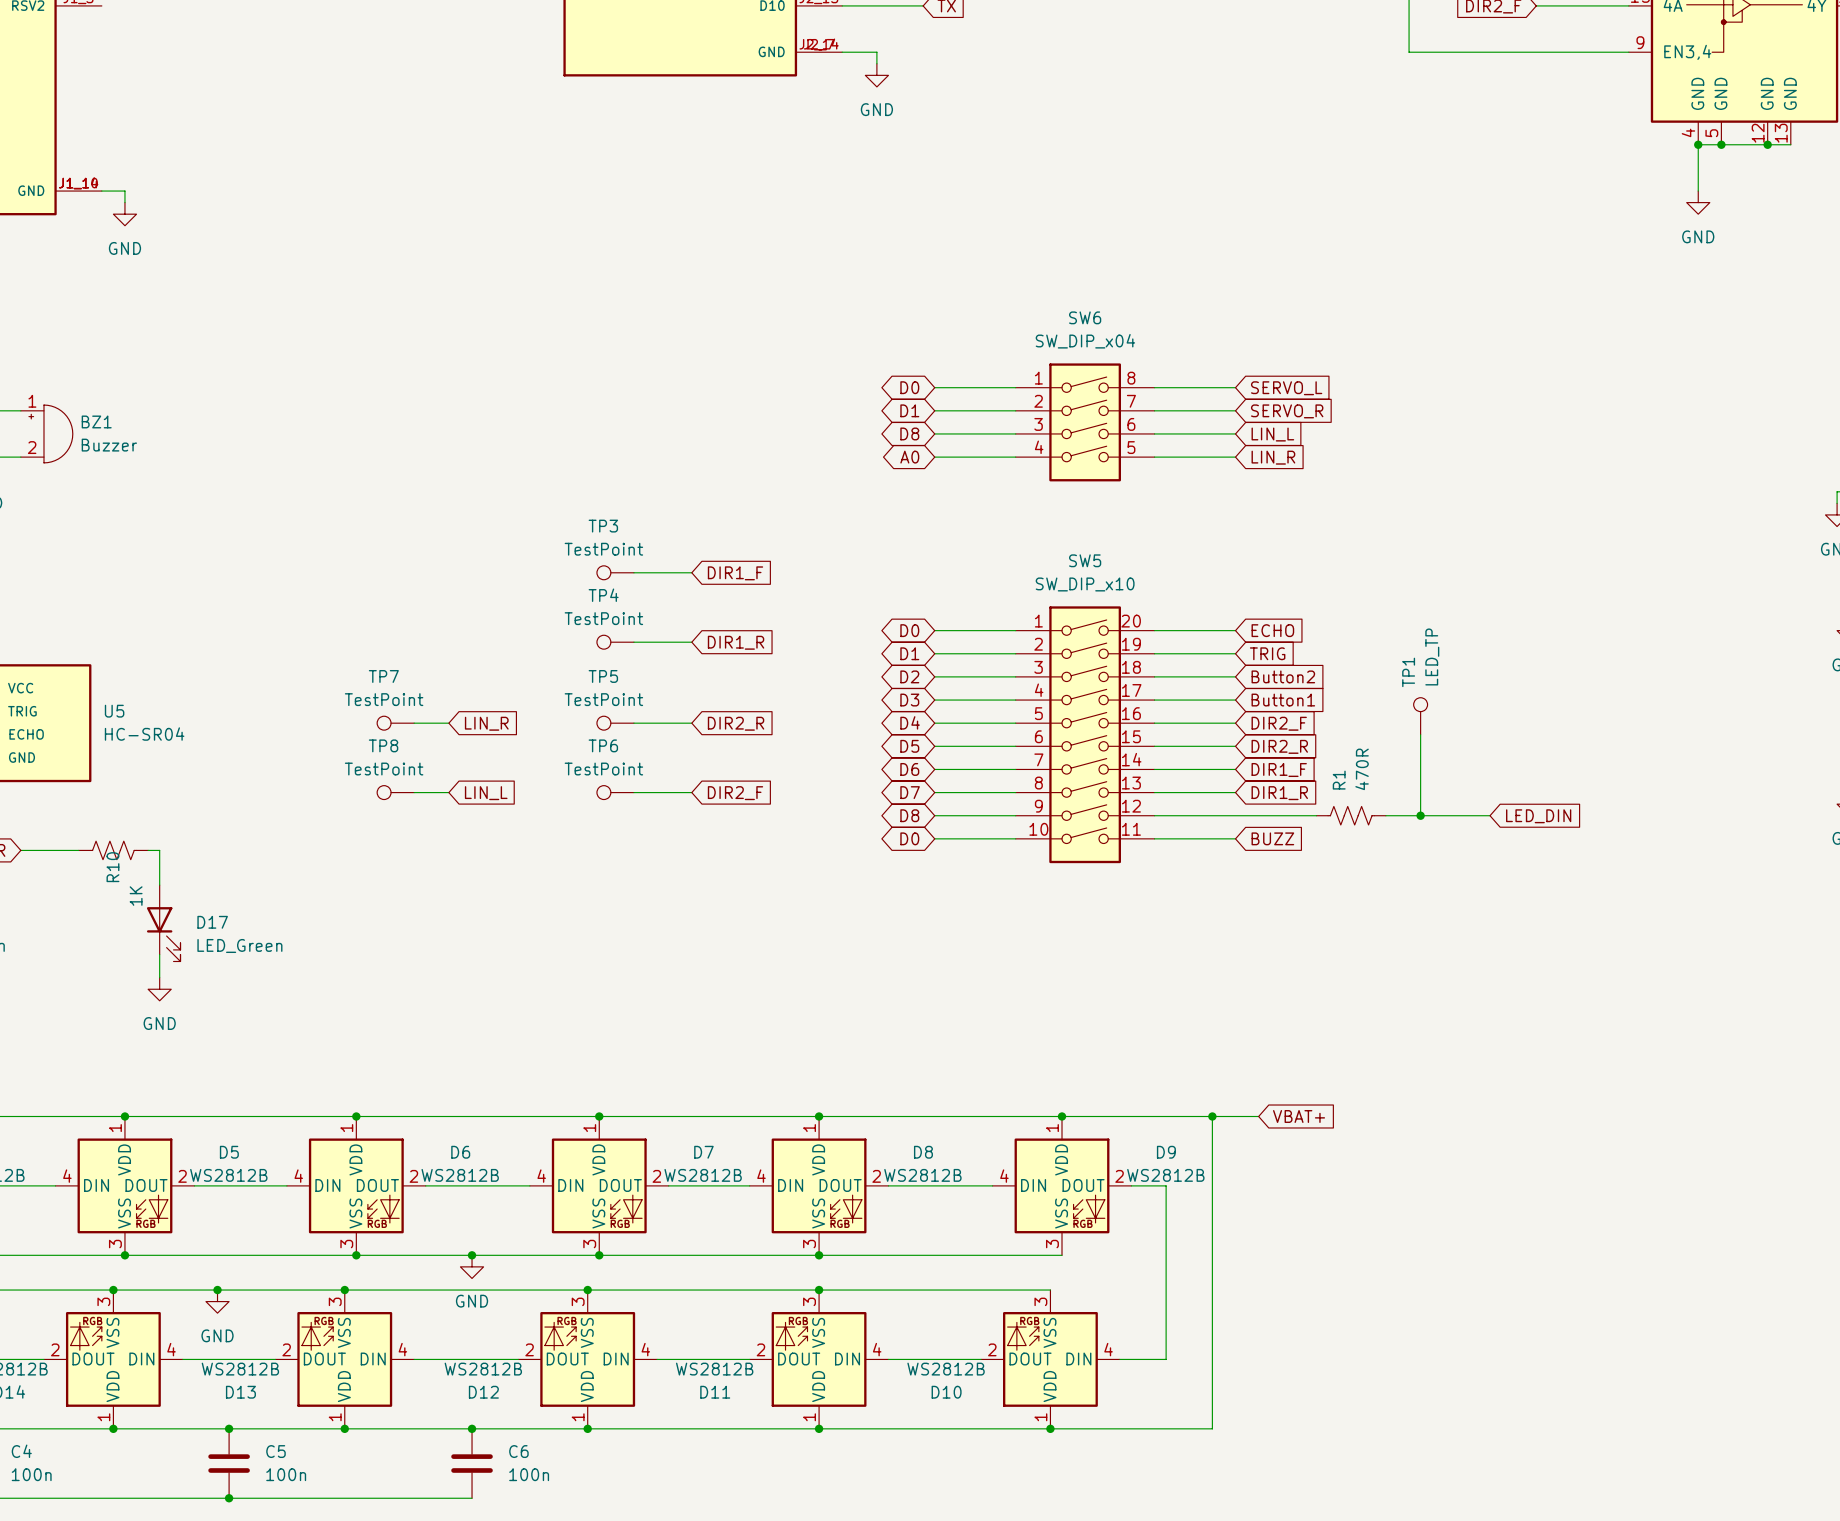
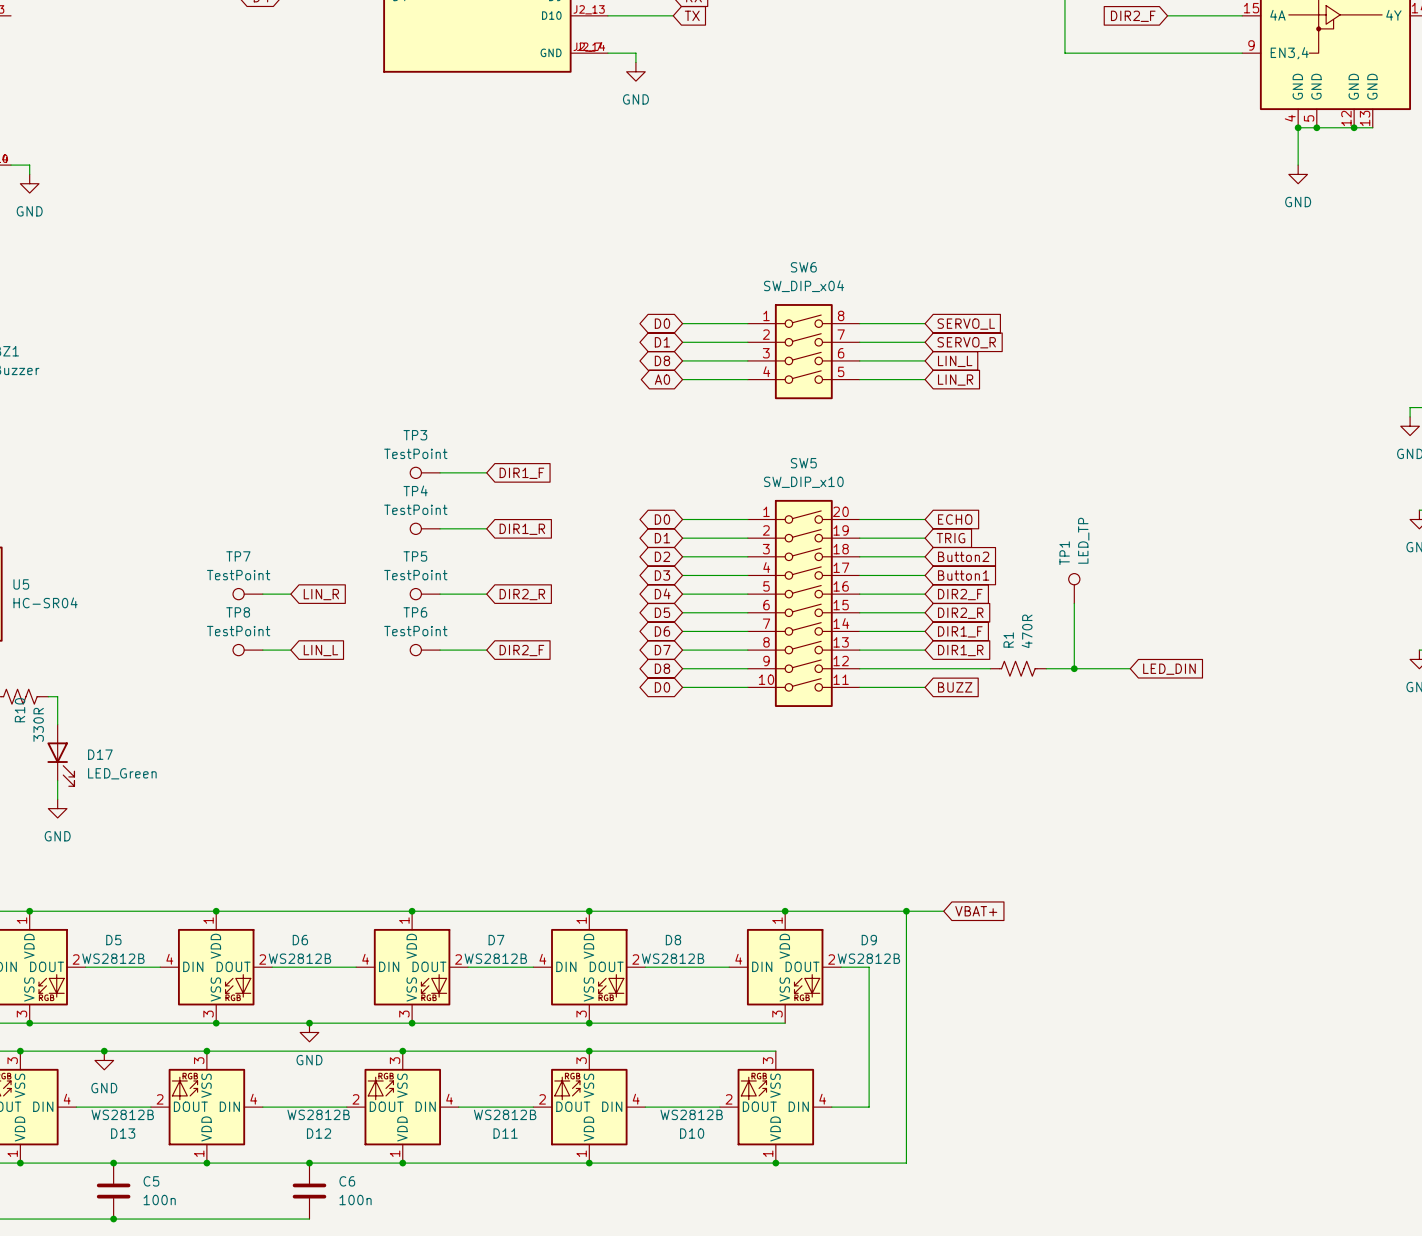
R10 value: 1K (136, 896) -> 330R (38, 724)

